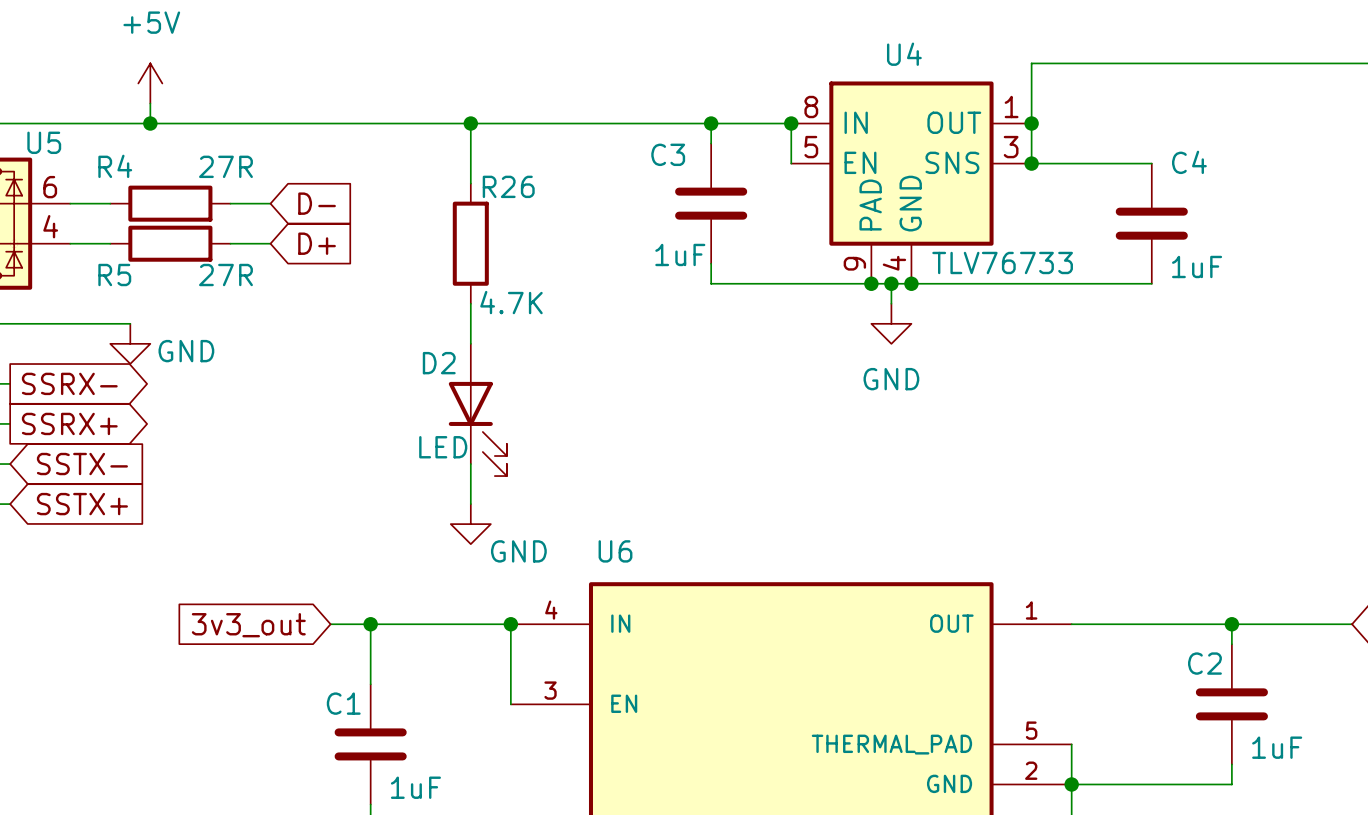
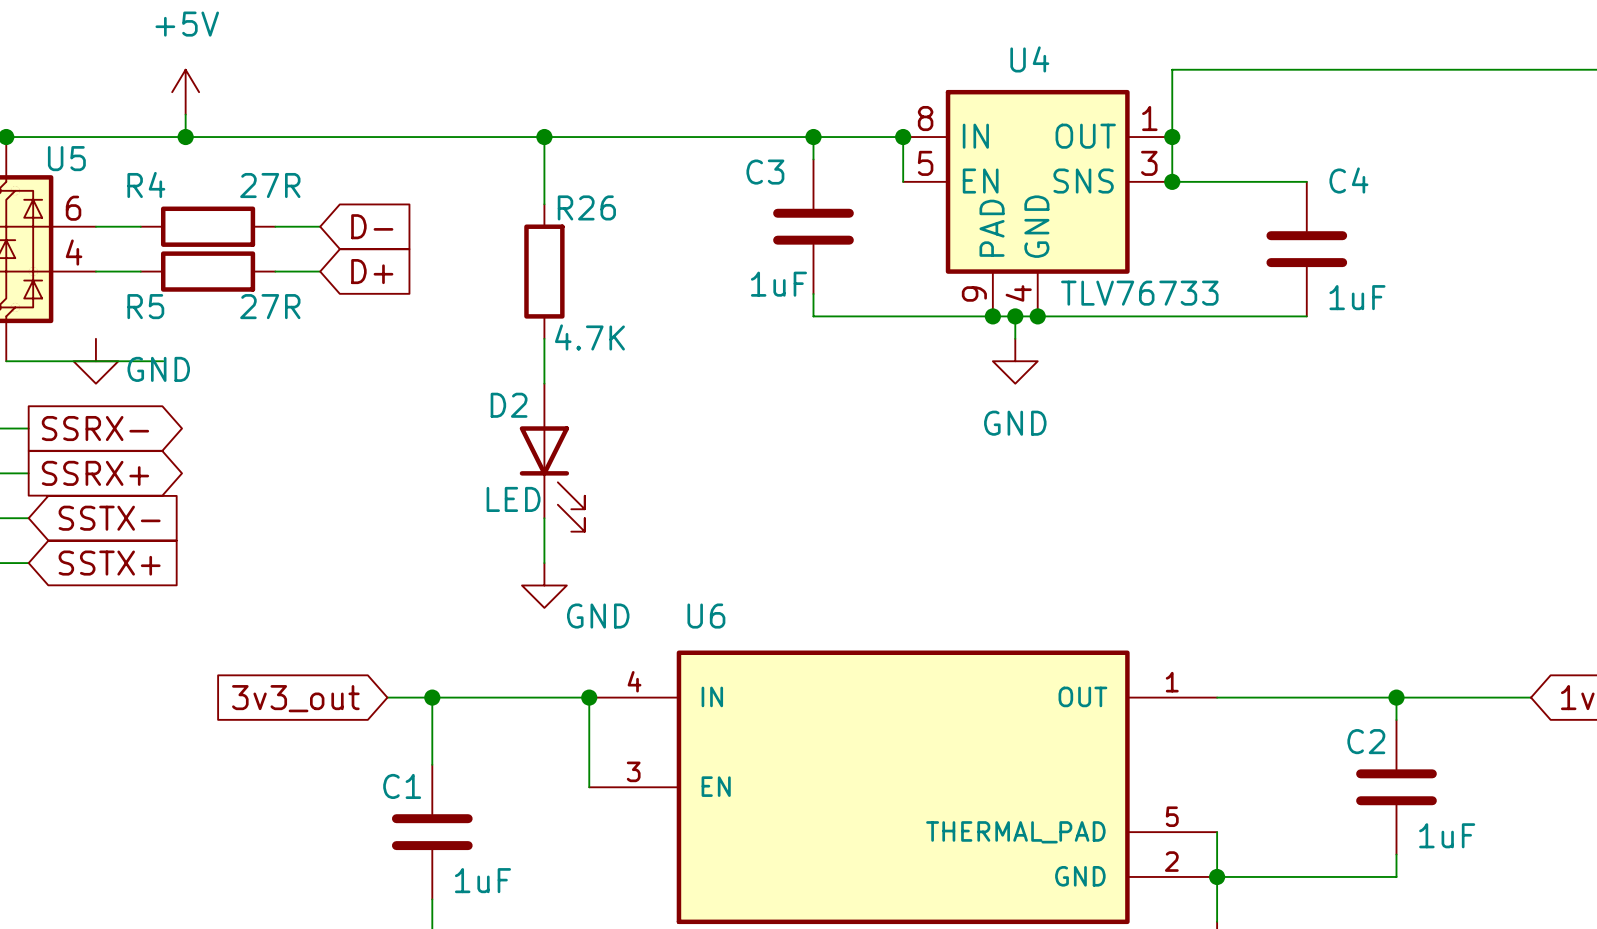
power symbol position: GND (130, 343) -> GND (95, 361)

